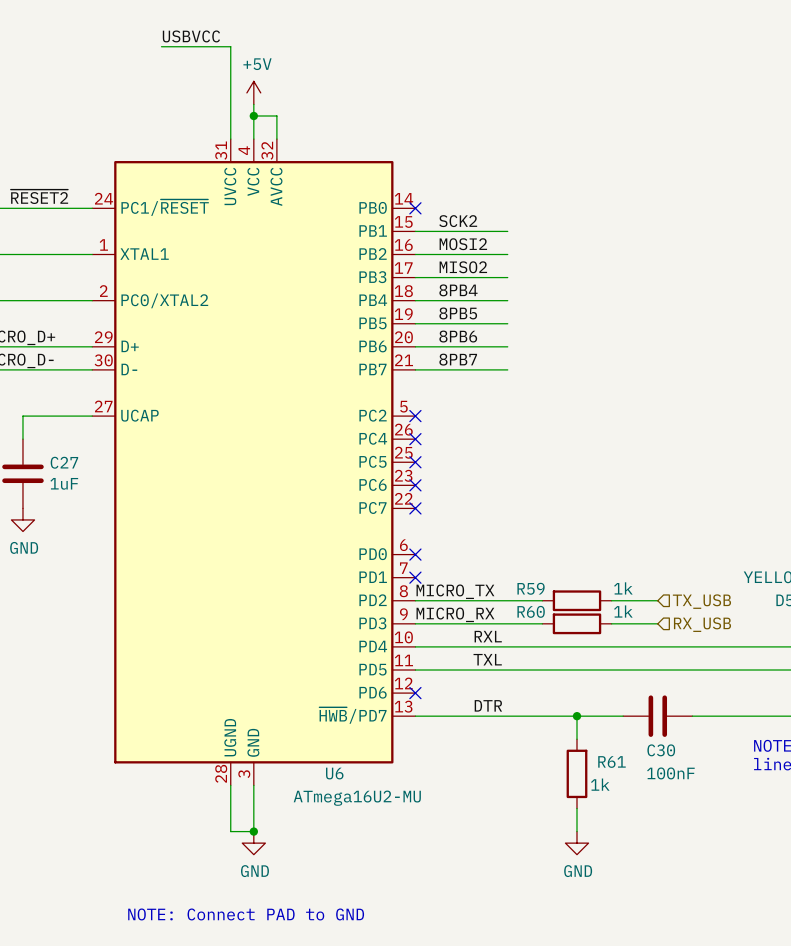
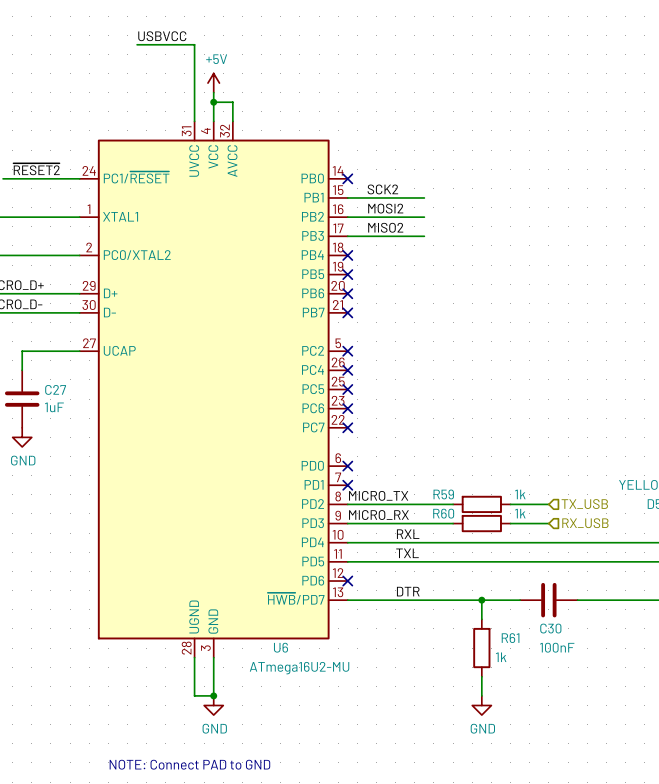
label: 8PB4 (458, 290) -> none
wire: (415, 300) (507, 300) -> none
no-connect mark: none -> (347, 255)
label: 8PB5 (458, 313) -> none
wire: (415, 323) (507, 323) -> none
no-connect mark: none -> (347, 274)
label: 8PB6 (458, 336) -> none
wire: (415, 346) (507, 346) -> none
no-connect mark: none -> (347, 293)
label: 8PB7 (458, 359) -> none
wire: (415, 369) (507, 369) -> none
no-connect mark: none -> (347, 312)

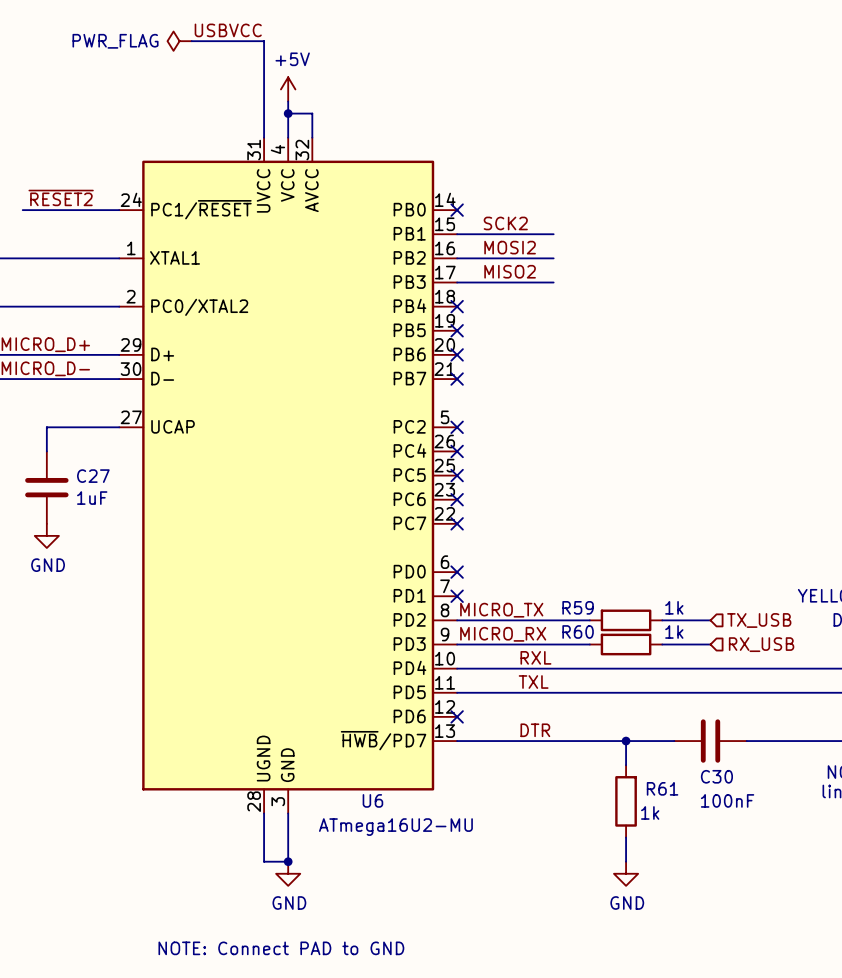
power symbol: none -> PWR_FLAG (179, 41)

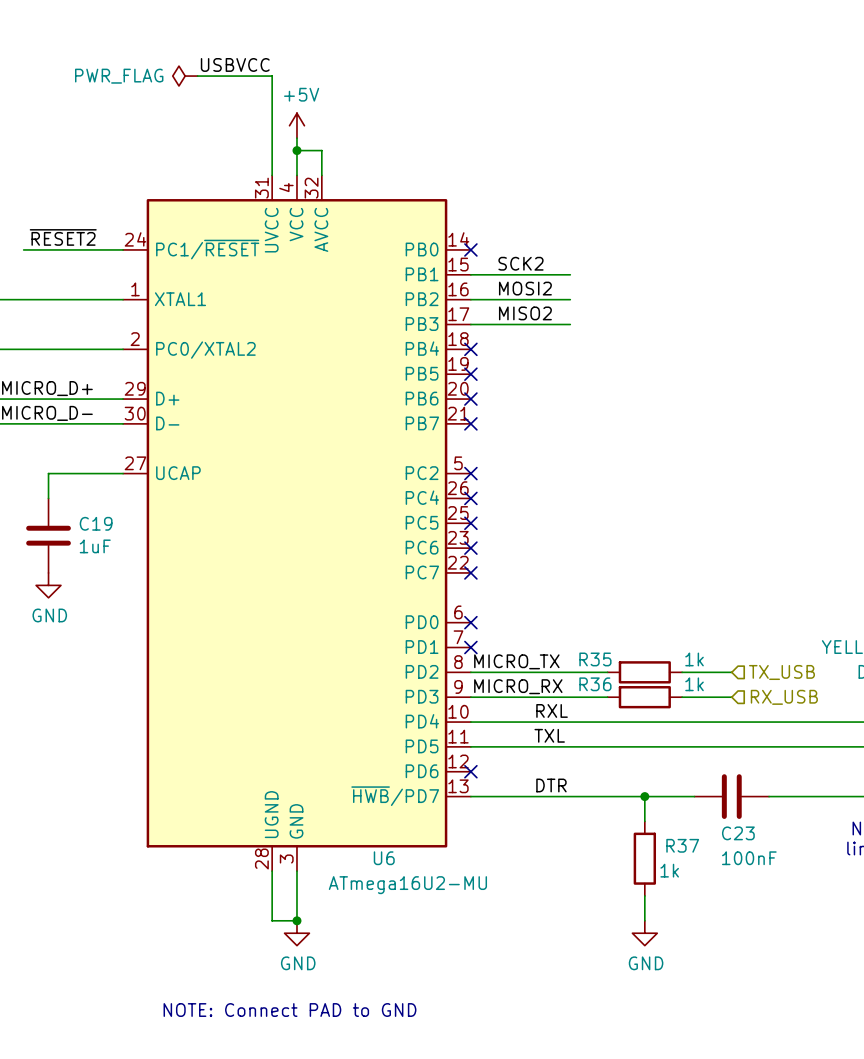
C27 name: C27 (93, 476) -> C19 (96, 523)
R59 name: R59 (578, 607) -> R35 (595, 659)
R60 name: R60 (578, 631) -> R36 (595, 684)
C30 name: C30 (716, 776) -> C23 (738, 833)
R61 name: R61 (662, 788) -> R37 (682, 845)

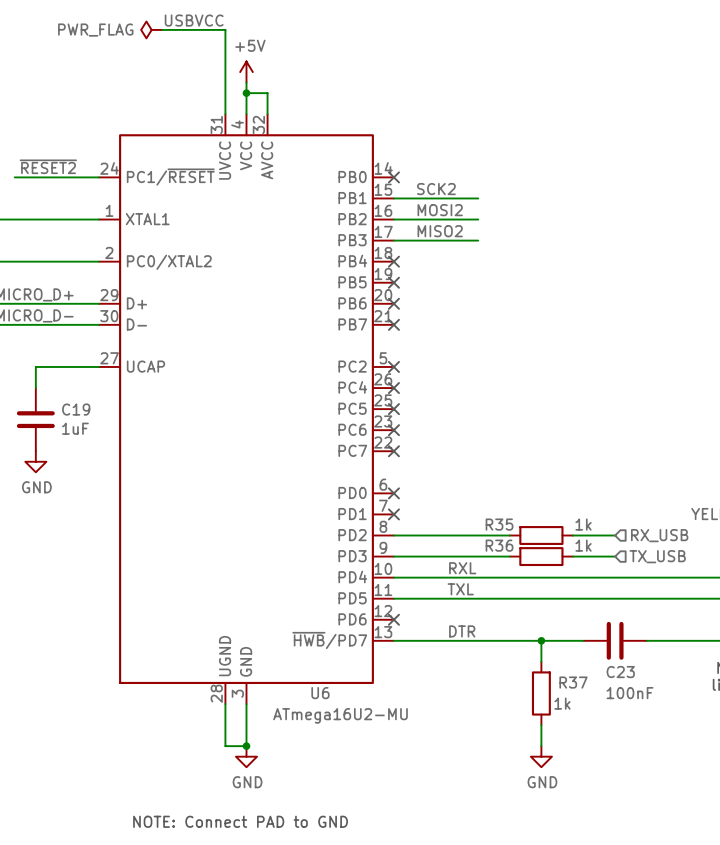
label: MICRO_TX (516, 661) -> none
hierarchical label: TX_USB (781, 672) -> RX_USB (659, 535)
label: MICRO_RX (518, 686) -> none
hierarchical label: RX_USB (784, 697) -> TX_USB (657, 556)

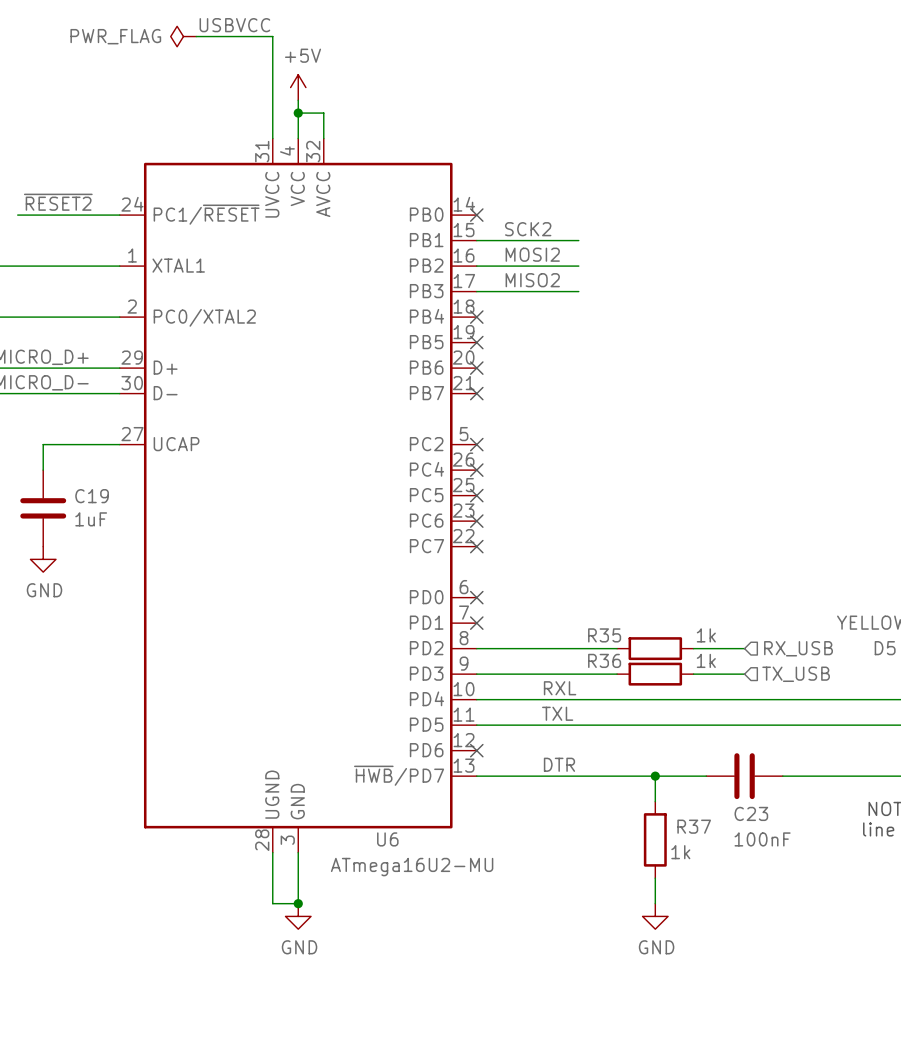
text: NOTE: Connect PAD to GND (240, 821) -> none

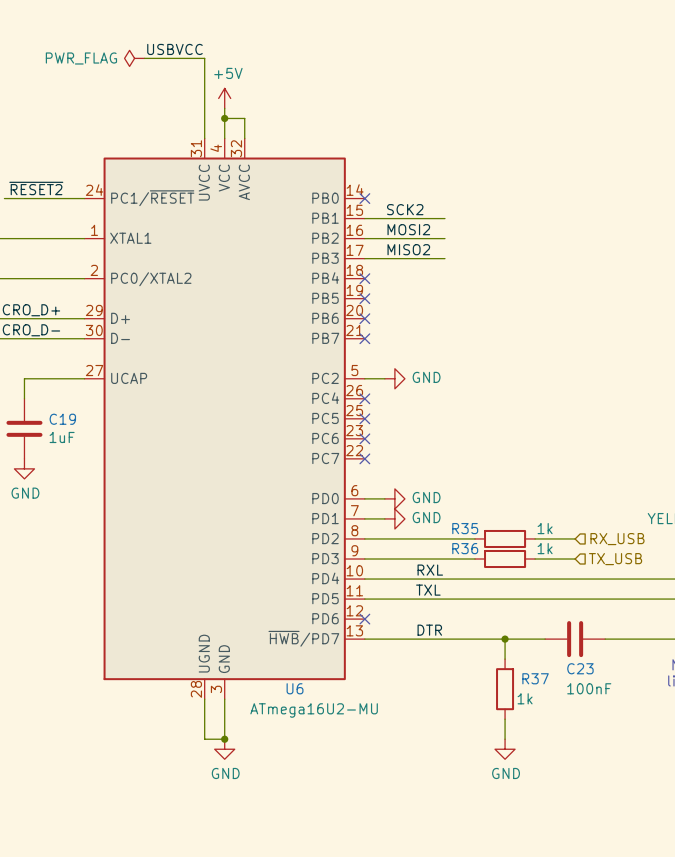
wire: none -> (364, 378) (384, 378)
no-connect mark: (476, 444) -> none
power symbol: none -> GND (394, 378)
wire: none -> (364, 498) (384, 498)
no-connect mark: (476, 597) -> none
power symbol: none -> GND (394, 498)
wire: none -> (364, 518) (384, 518)
no-connect mark: (476, 623) -> none
power symbol: none -> GND (394, 518)

